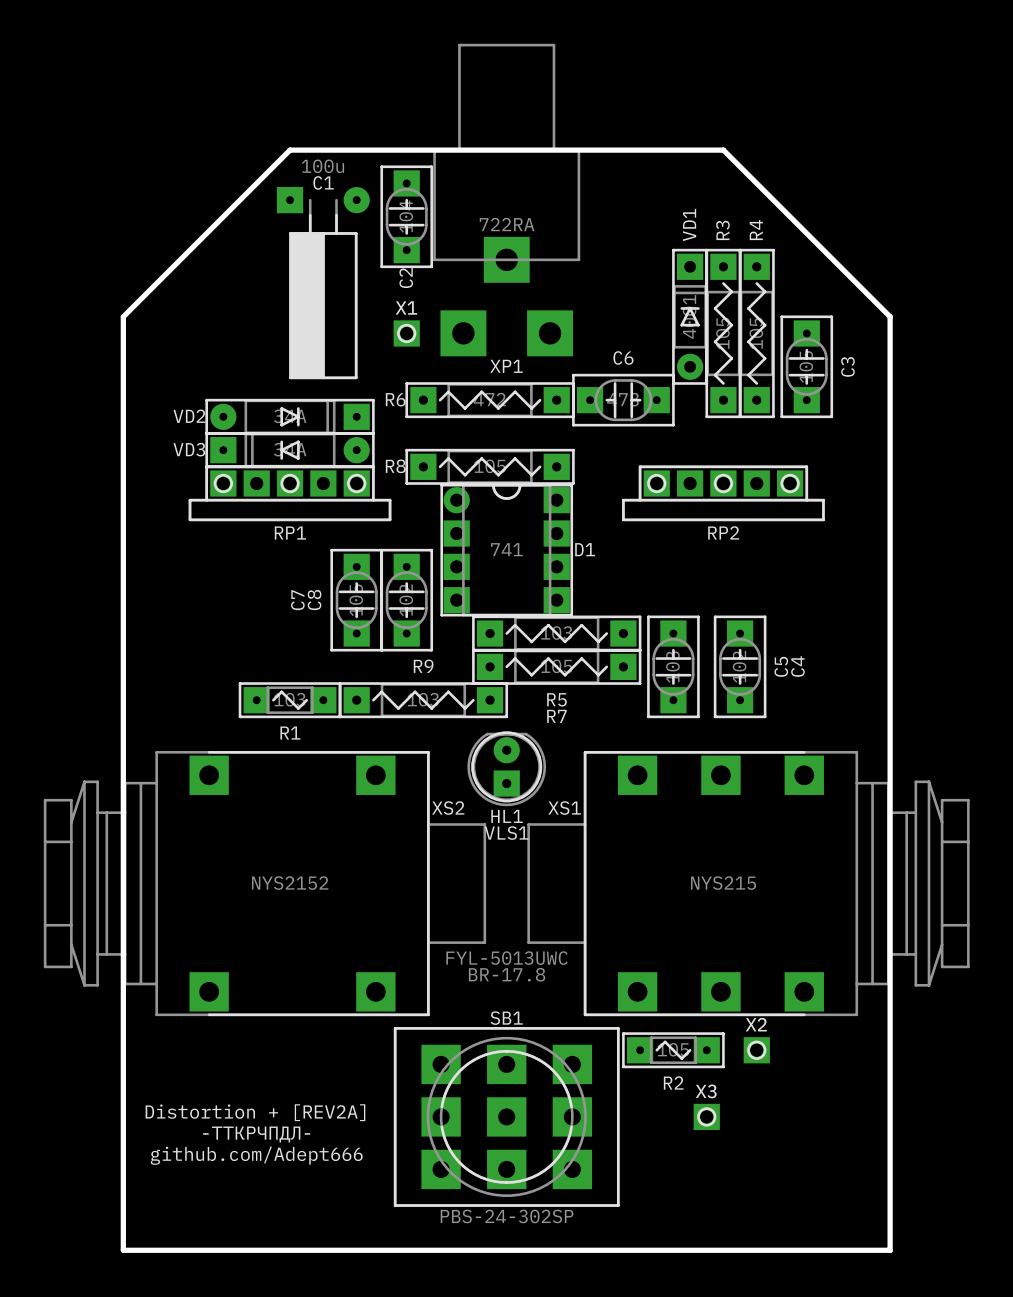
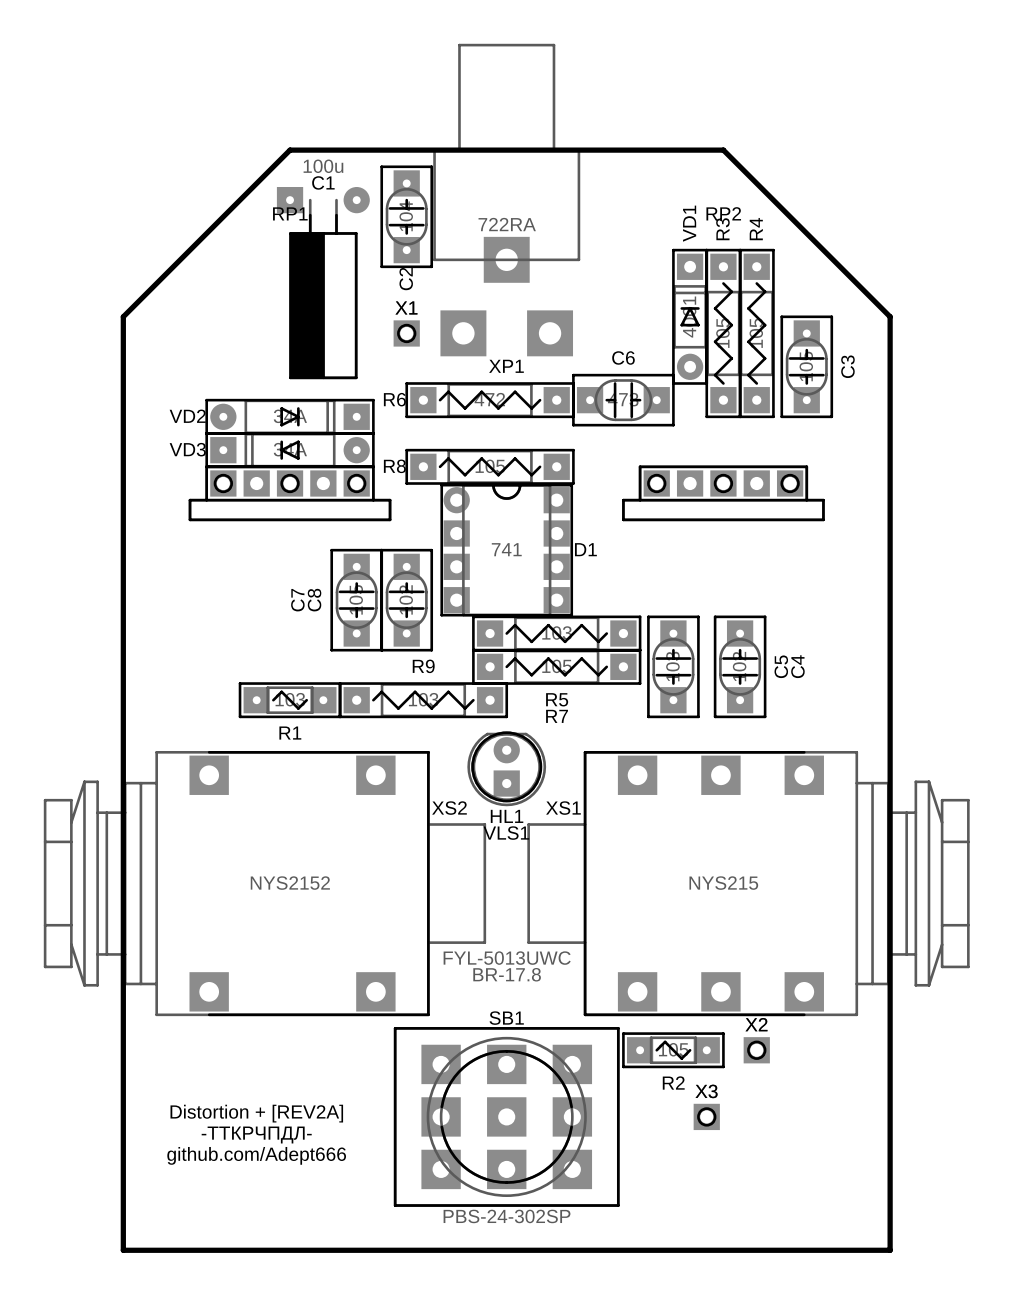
RP2 name position: RP2 (723, 532) -> RP2 (723, 213)
RP1 name position: RP1 (290, 533) -> RP1 (290, 213)

